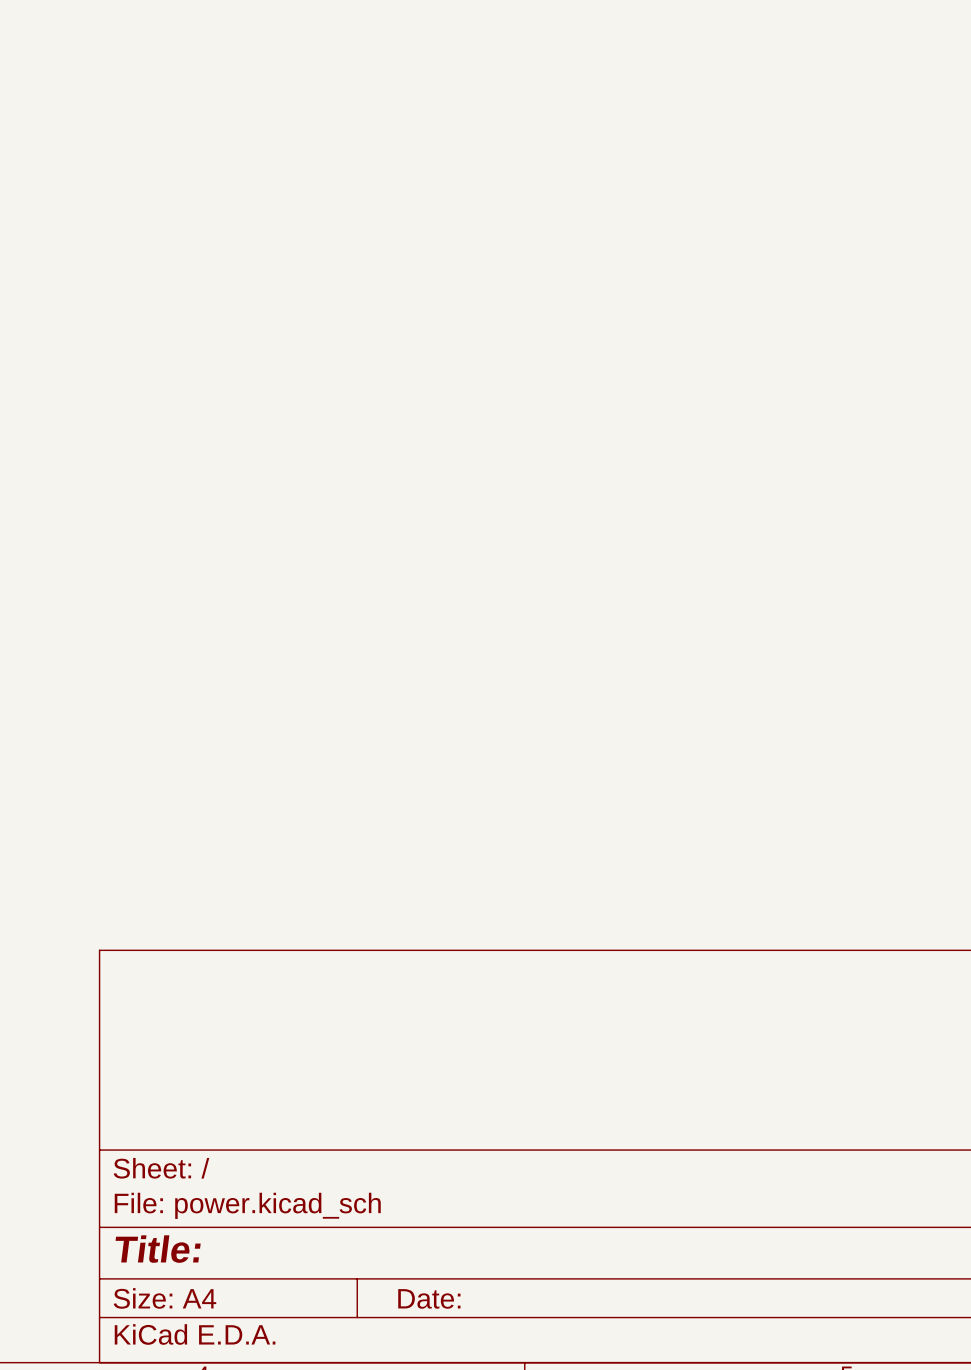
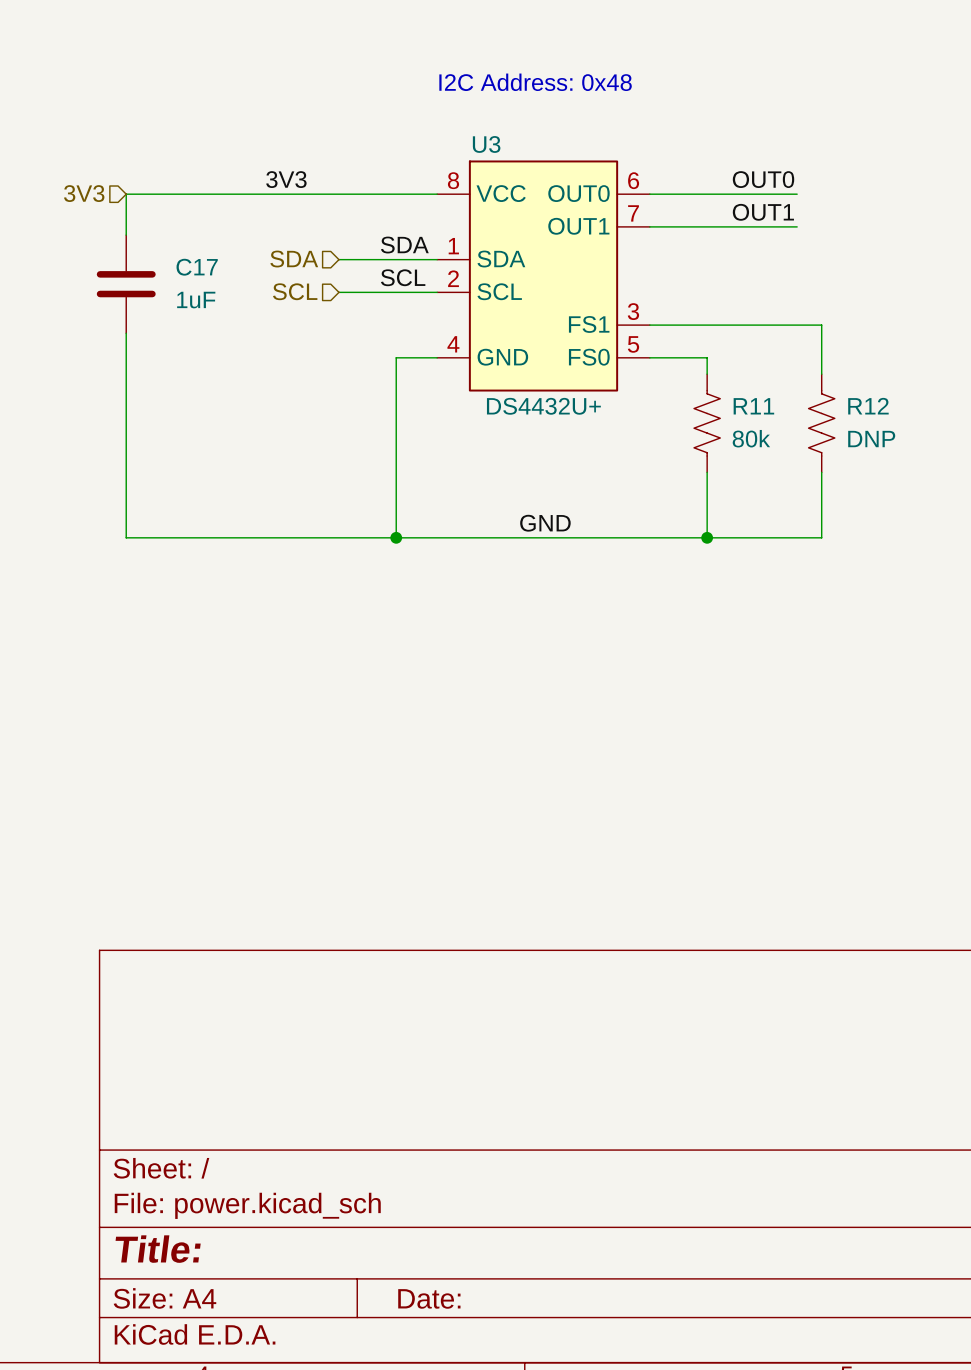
text: none -> I2C Address: 0x48 (535, 82)
label: none -> 3V3 (286, 179)
label: none -> OUT0 (763, 179)
hierarchical label: none -> 3V3 (84, 193)
wire: none -> (437, 194) (126, 194) (126, 235)
wire: none -> (649, 194) (797, 194)
label: none -> OUT1 (763, 212)
wire: none -> (649, 226) (797, 226)
label: none -> SDA (404, 245)
hierarchical label: none -> SDA (294, 259)
wire: none -> (338, 259) (437, 259)
U3: none -> DS4432U+ (543, 276)
label: none -> SCL (403, 277)
C17: none -> 1uF (126, 284)
hierarchical label: none -> SCL (295, 291)
wire: none -> (338, 292) (437, 292)
wire: none -> (649, 325) (821, 325) (821, 374)
wire: none -> (126, 333) (126, 537) (821, 537) (821, 472)
wire: none -> (437, 357) (396, 357) (396, 537)
wire: none -> (649, 357) (707, 357) (707, 374)
R11: none -> 80k (707, 423)
R12: none -> DNP (821, 423)
wire: none -> (707, 472) (707, 537)
label: none -> GND (545, 523)
junction: none -> (396, 537)
junction: none -> (707, 537)

